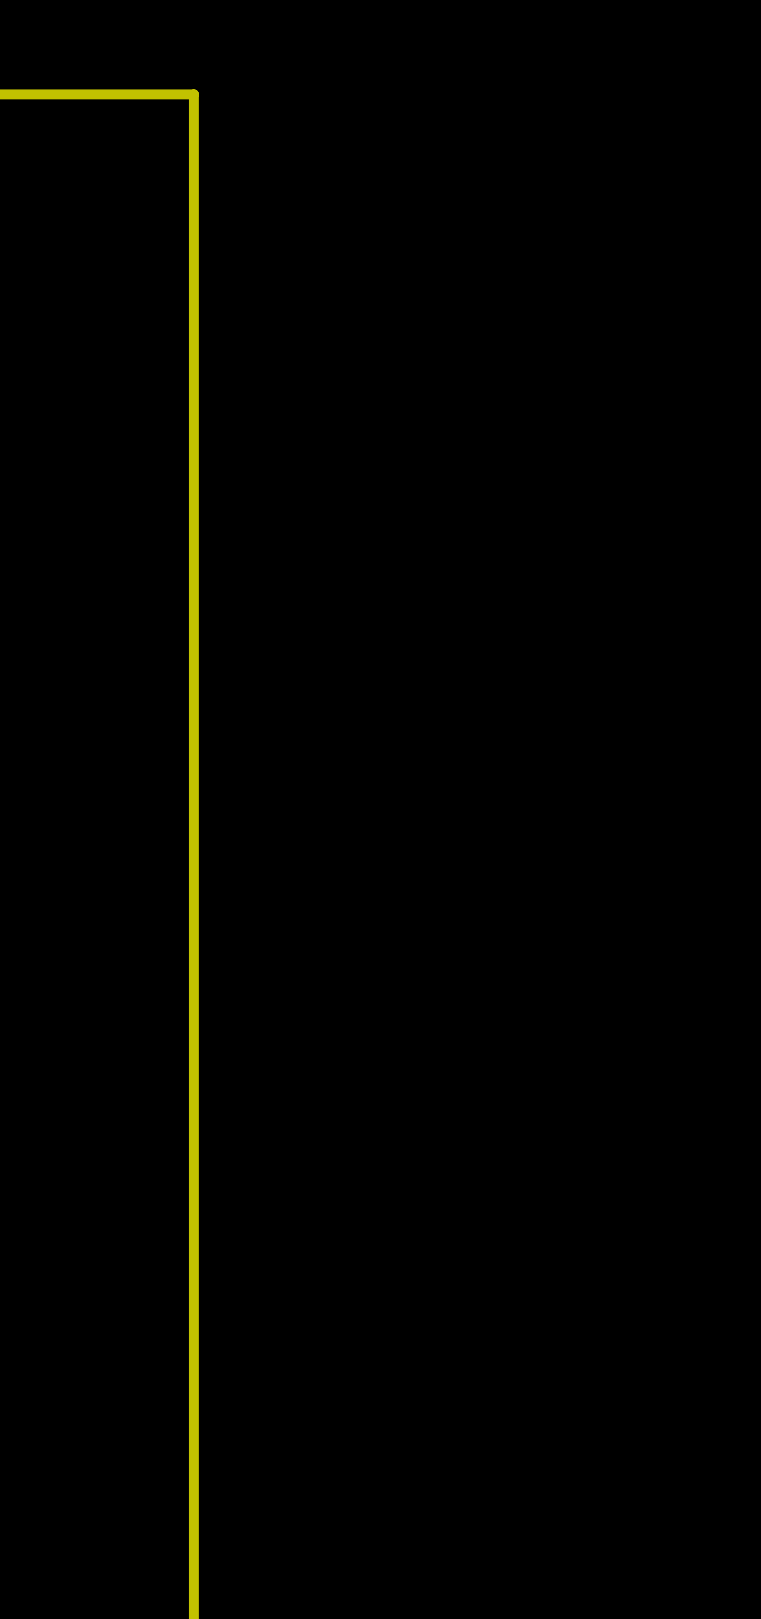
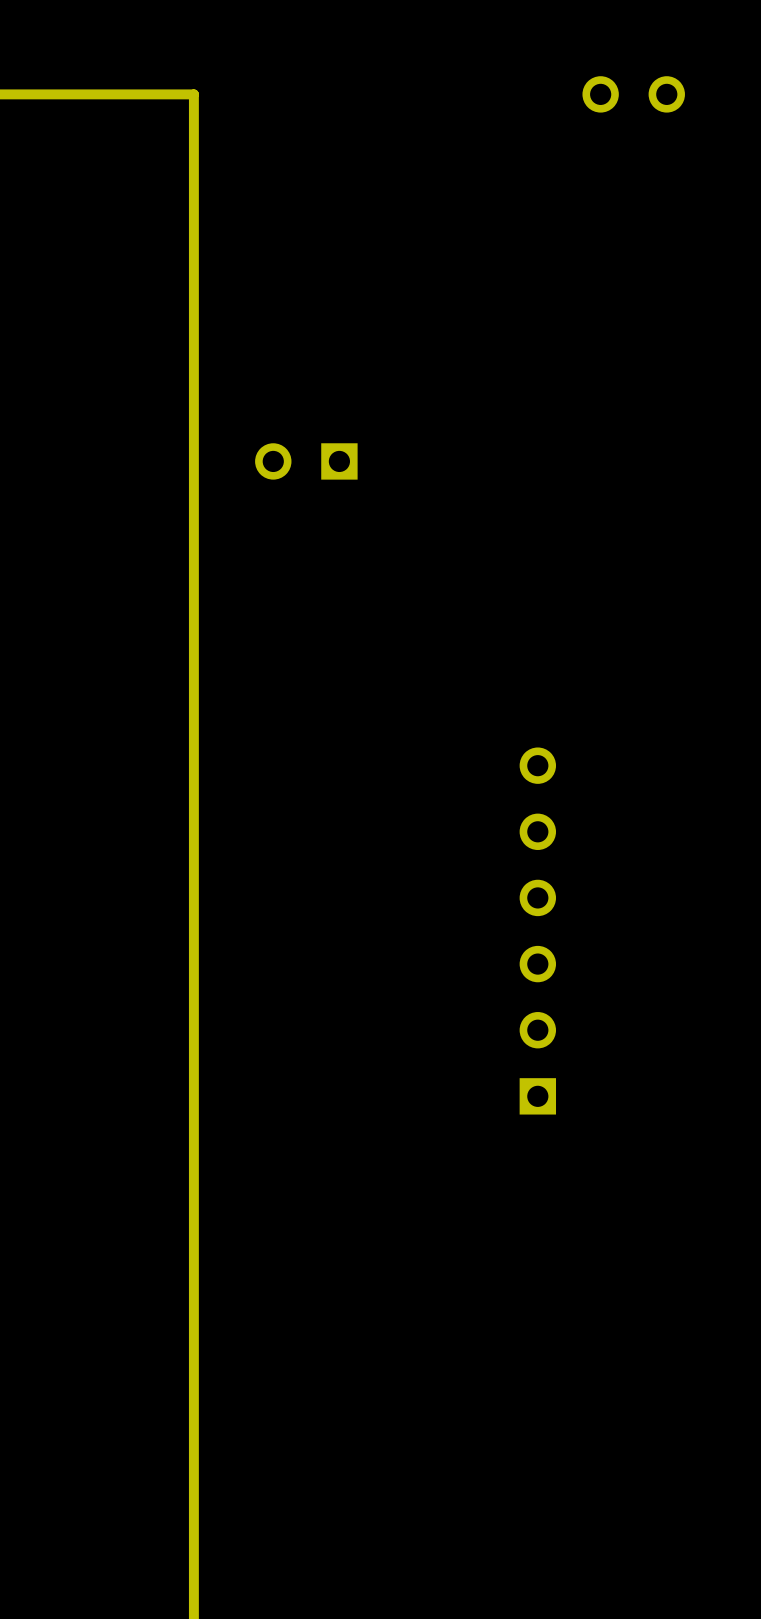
part: none -> (633, 94)
part: none -> (306, 461)
part: none -> (537, 931)

